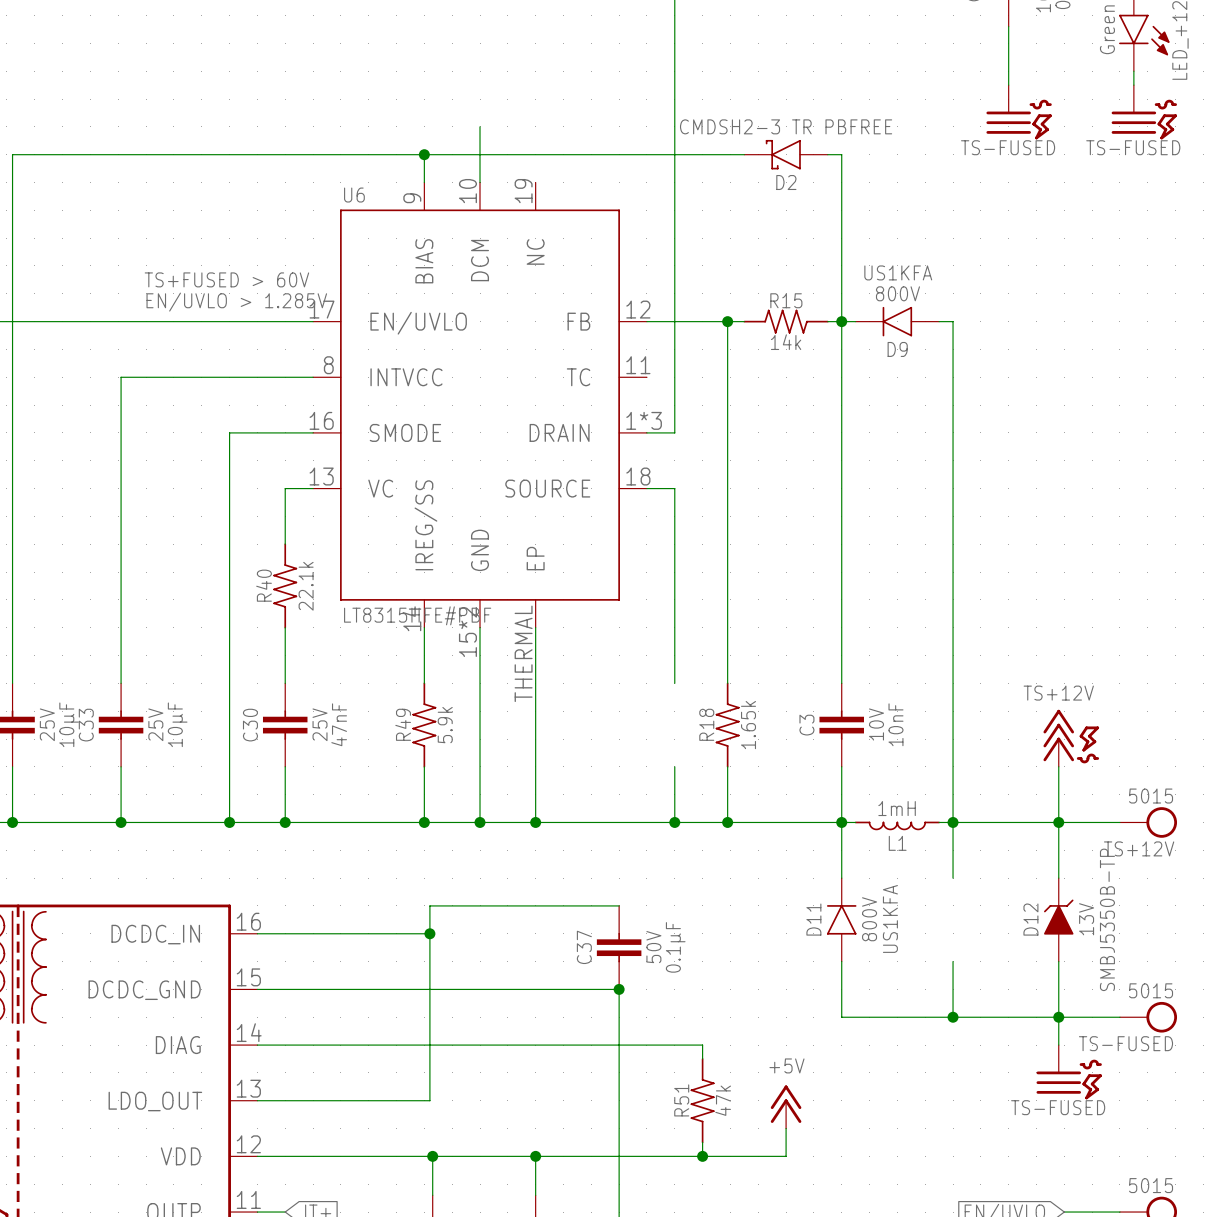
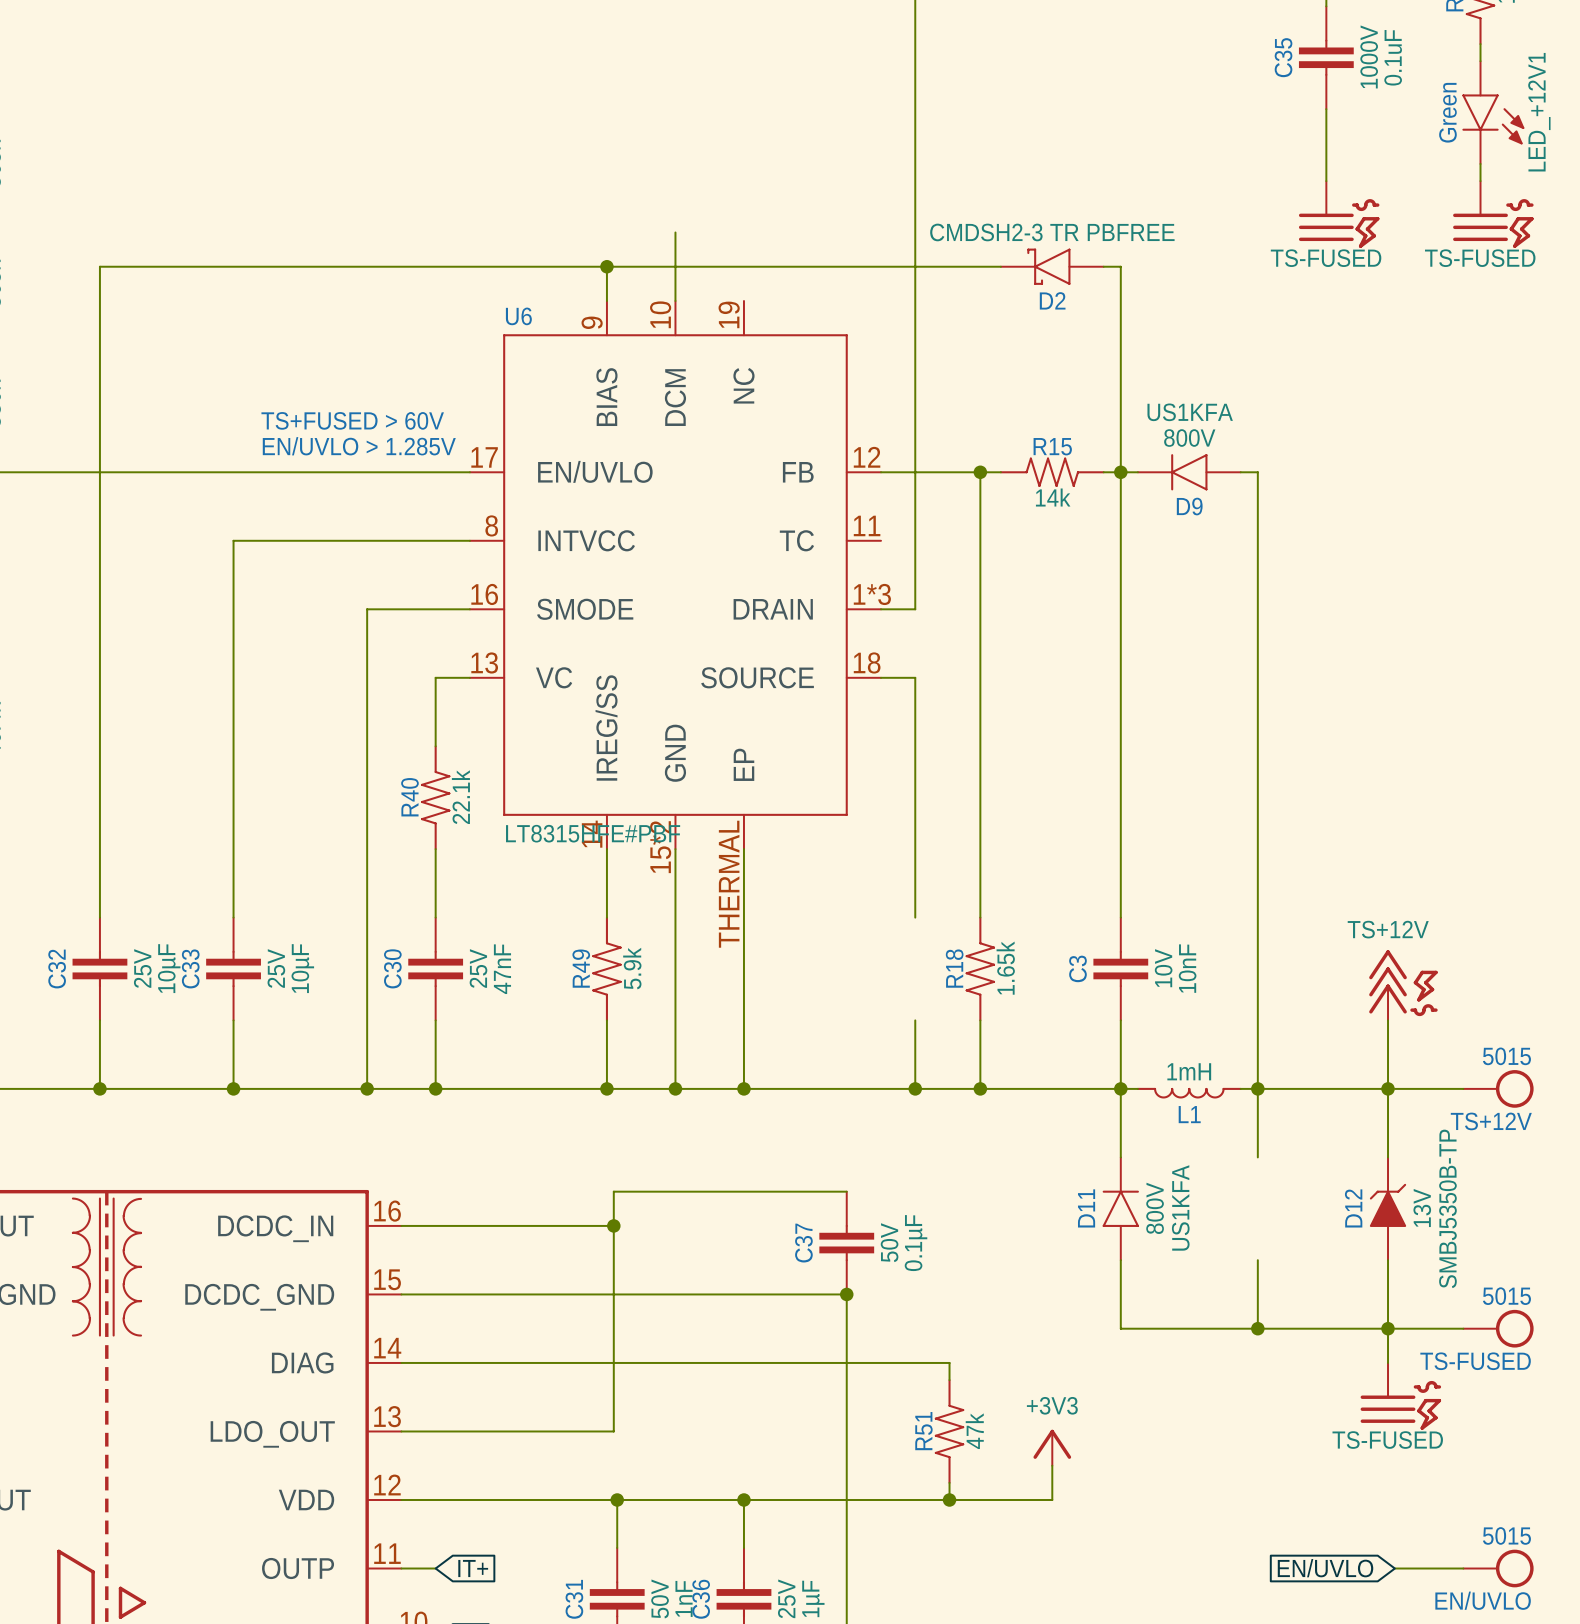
power symbol: +5V (786, 1106) -> +3V3 (1052, 1447)

